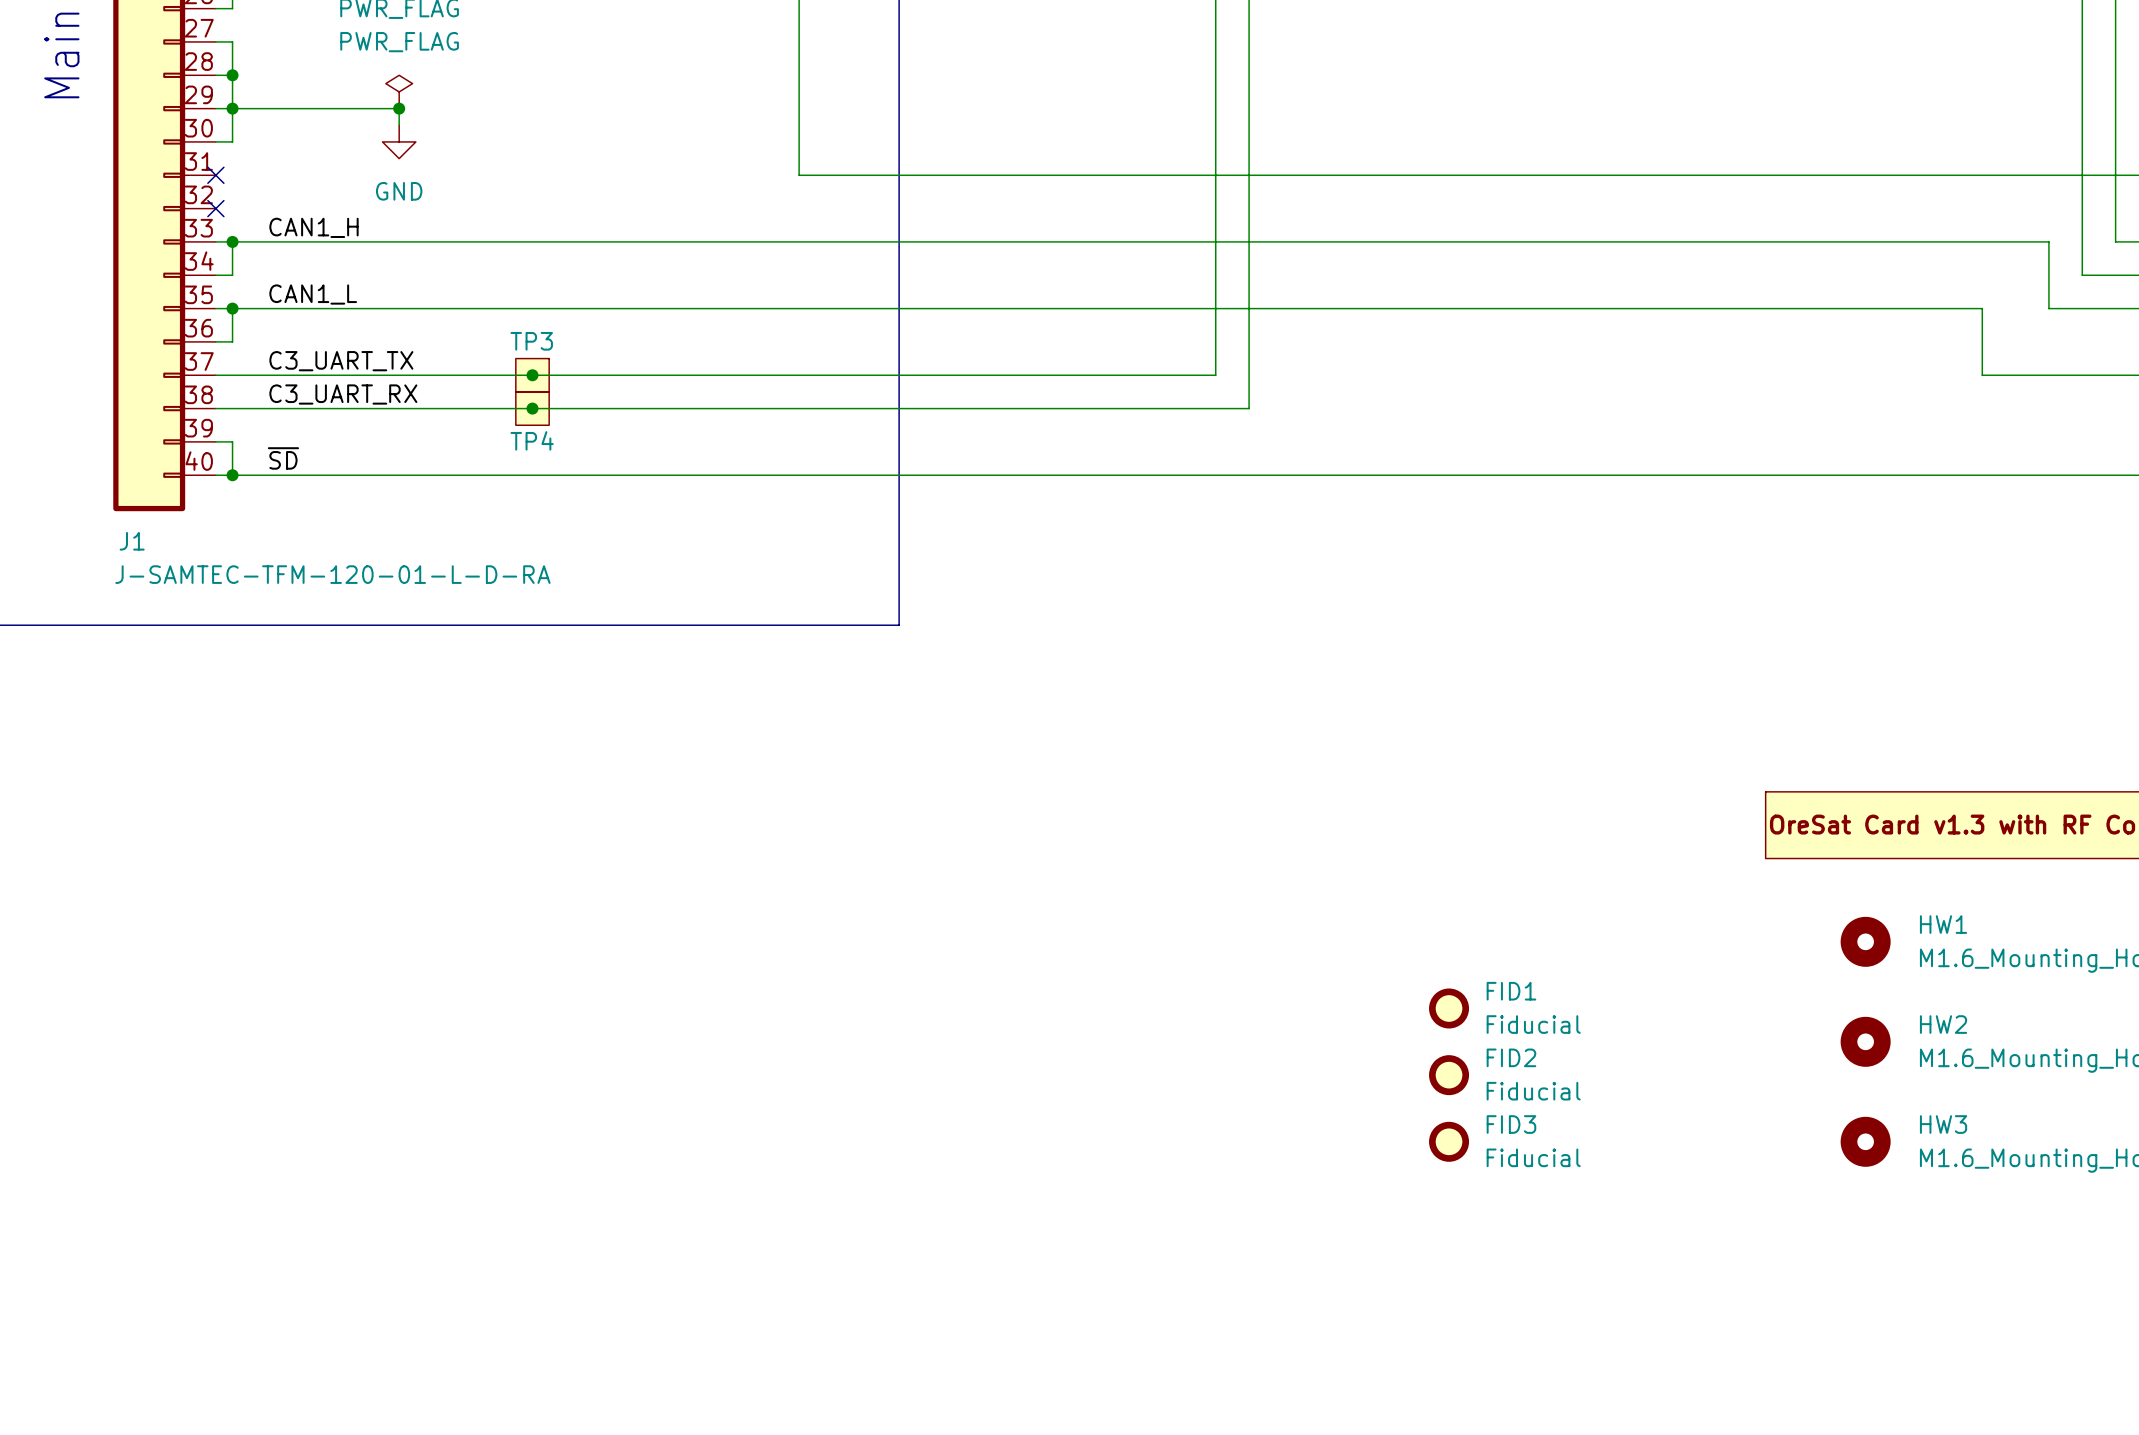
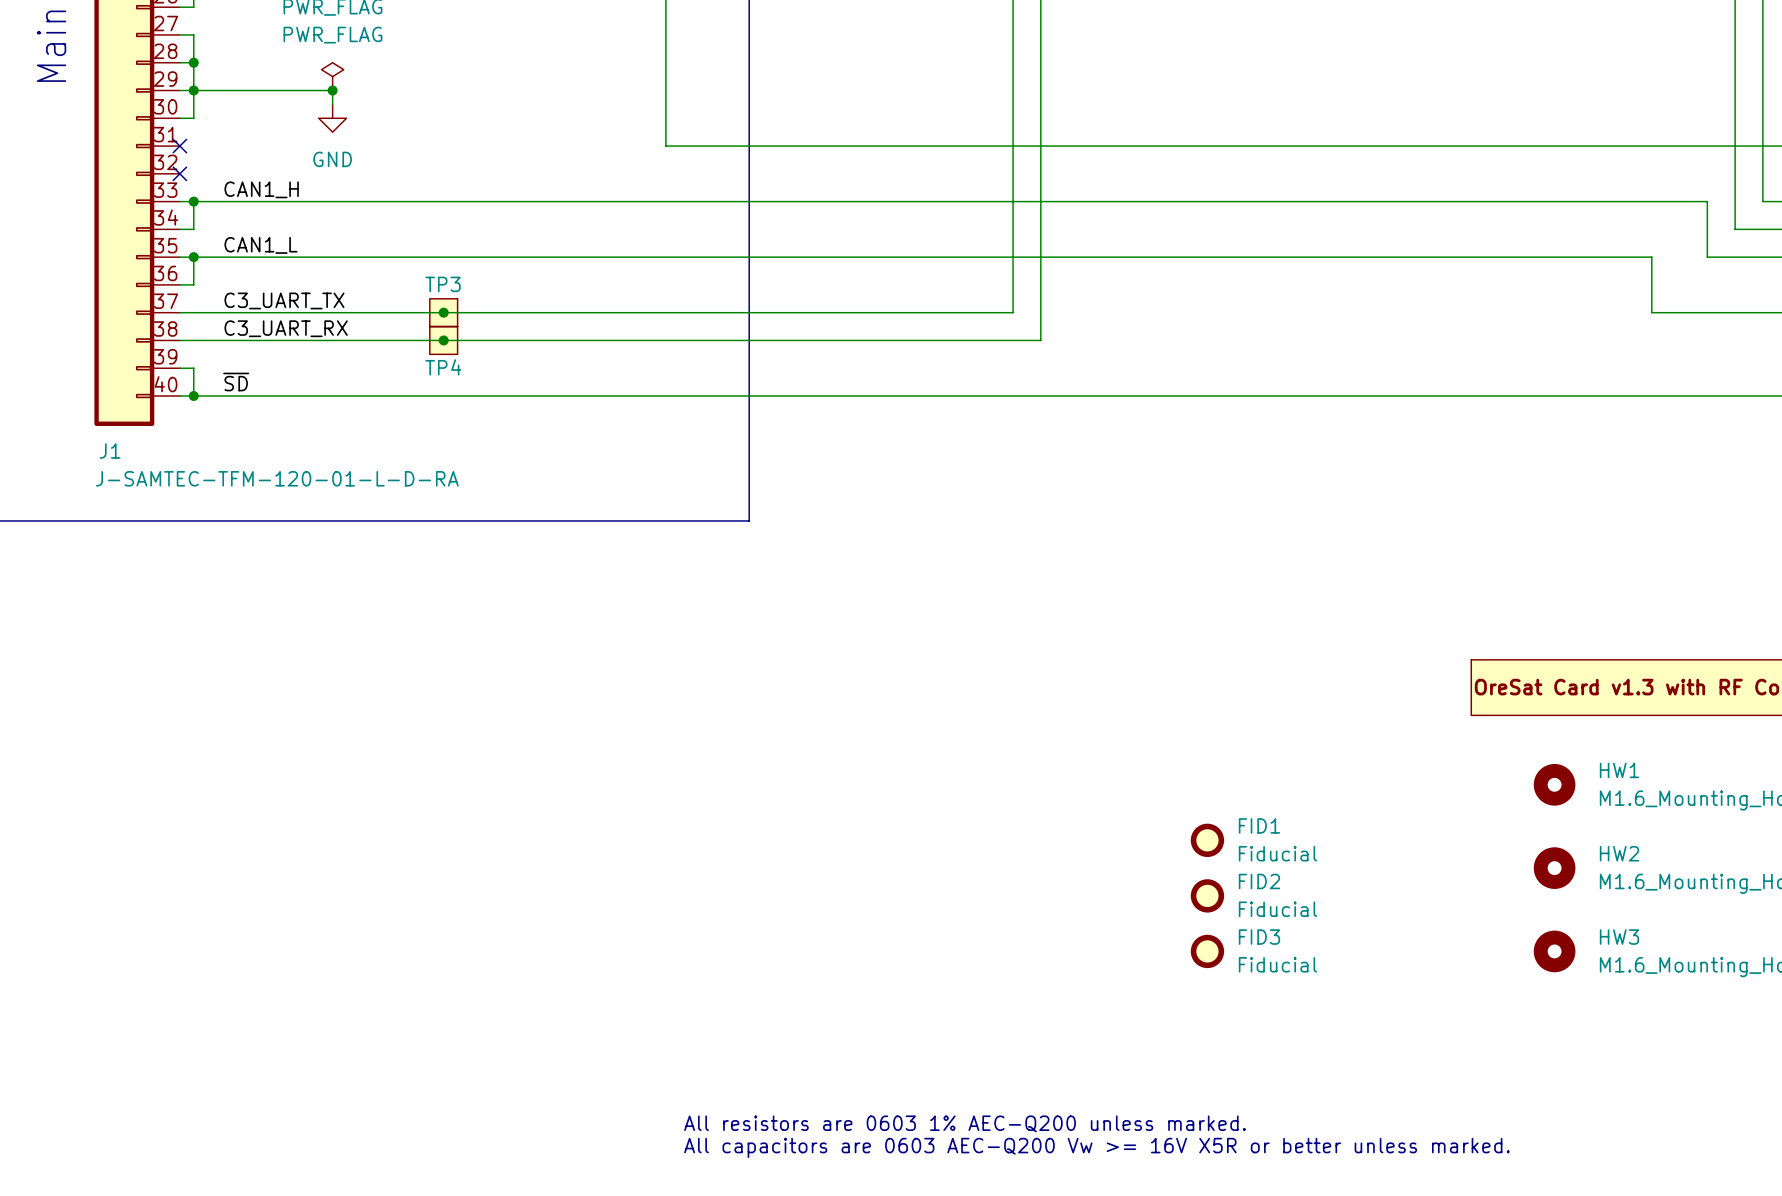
text: none -> All resistors are 0603 1% AEC-Q200 unless marked. (965, 1123)
text: none -> All capacitors are 0603 AEC-Q200 Vw >= 16V X5R or better unless marked. (1096, 1147)

